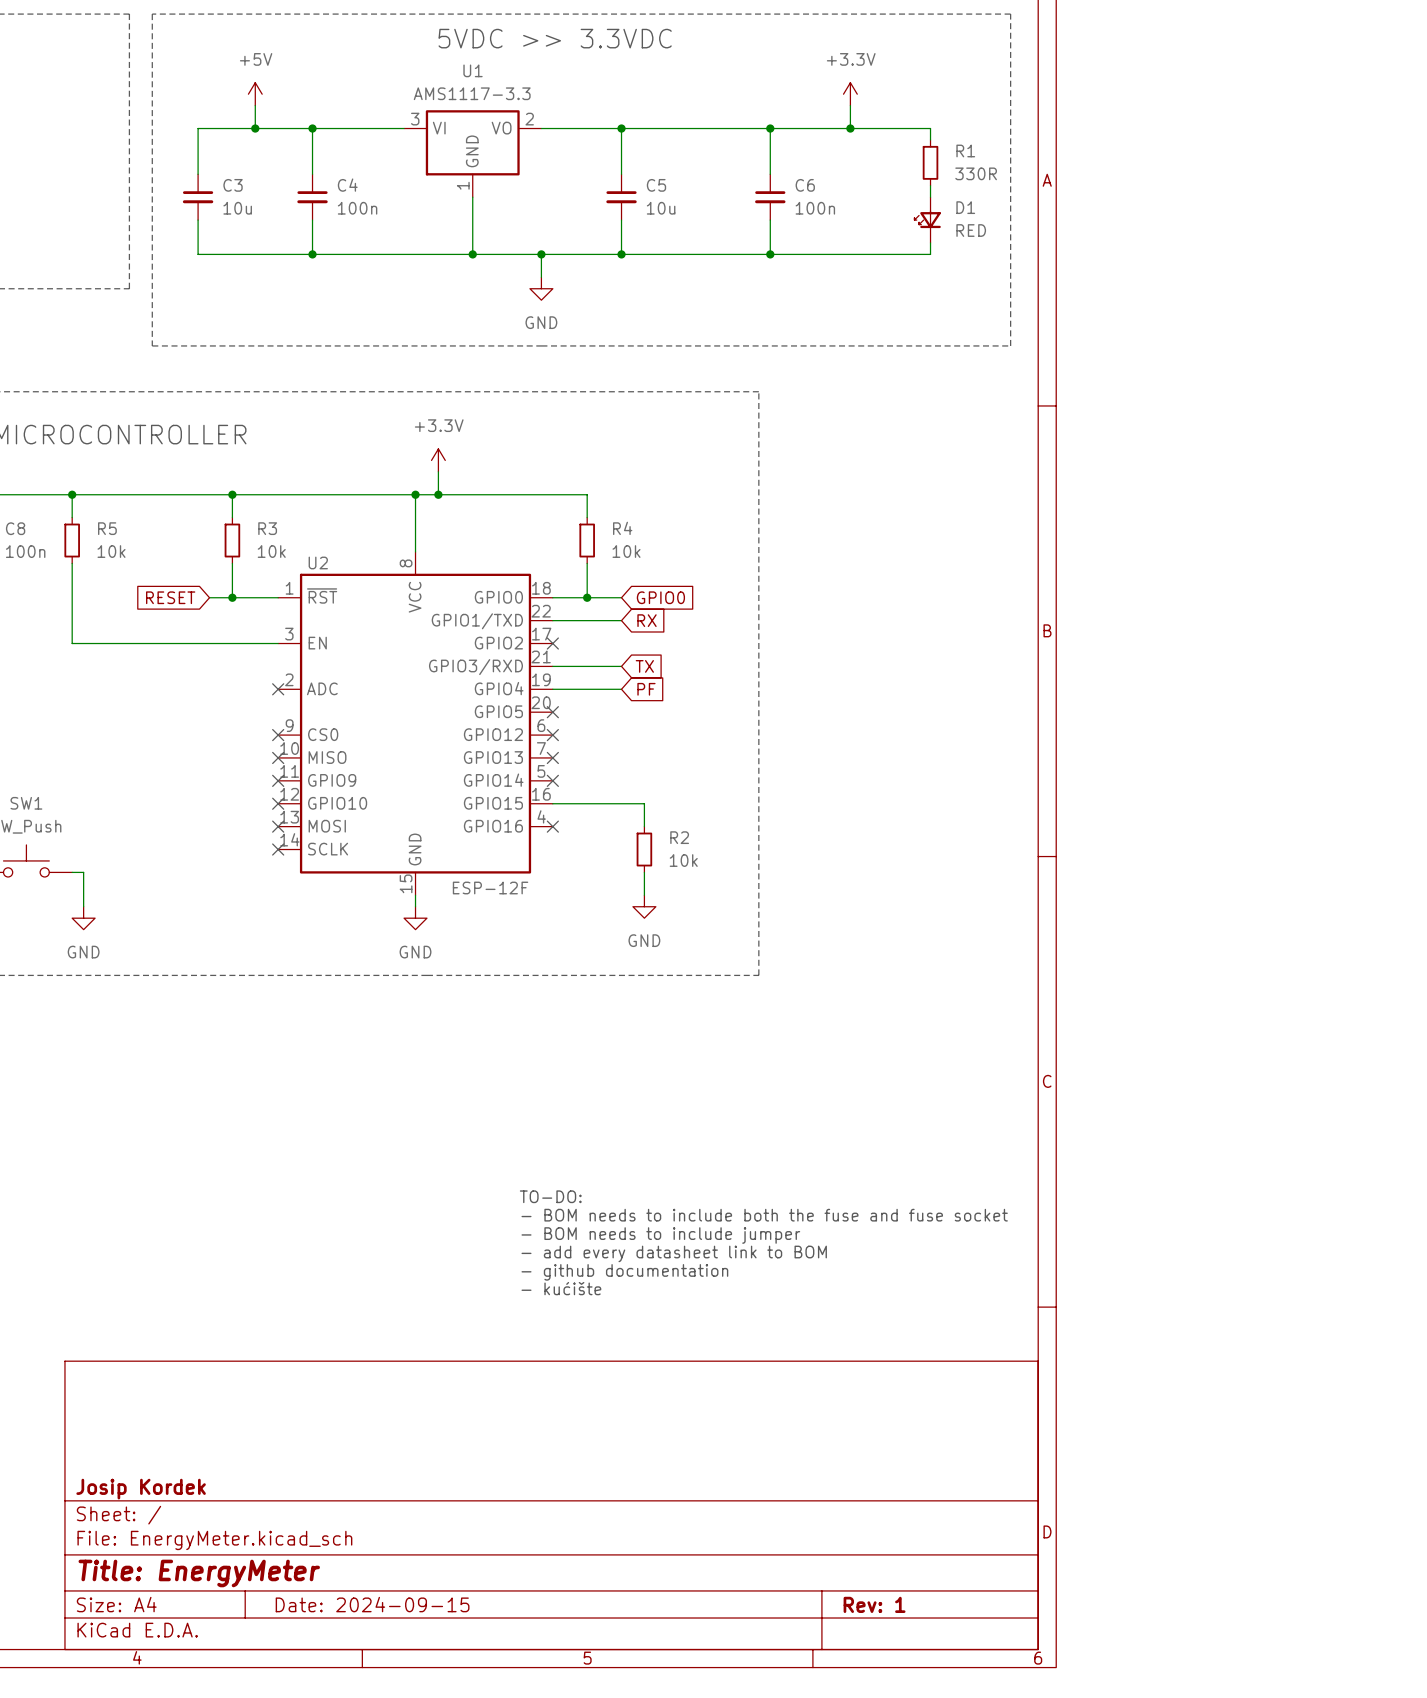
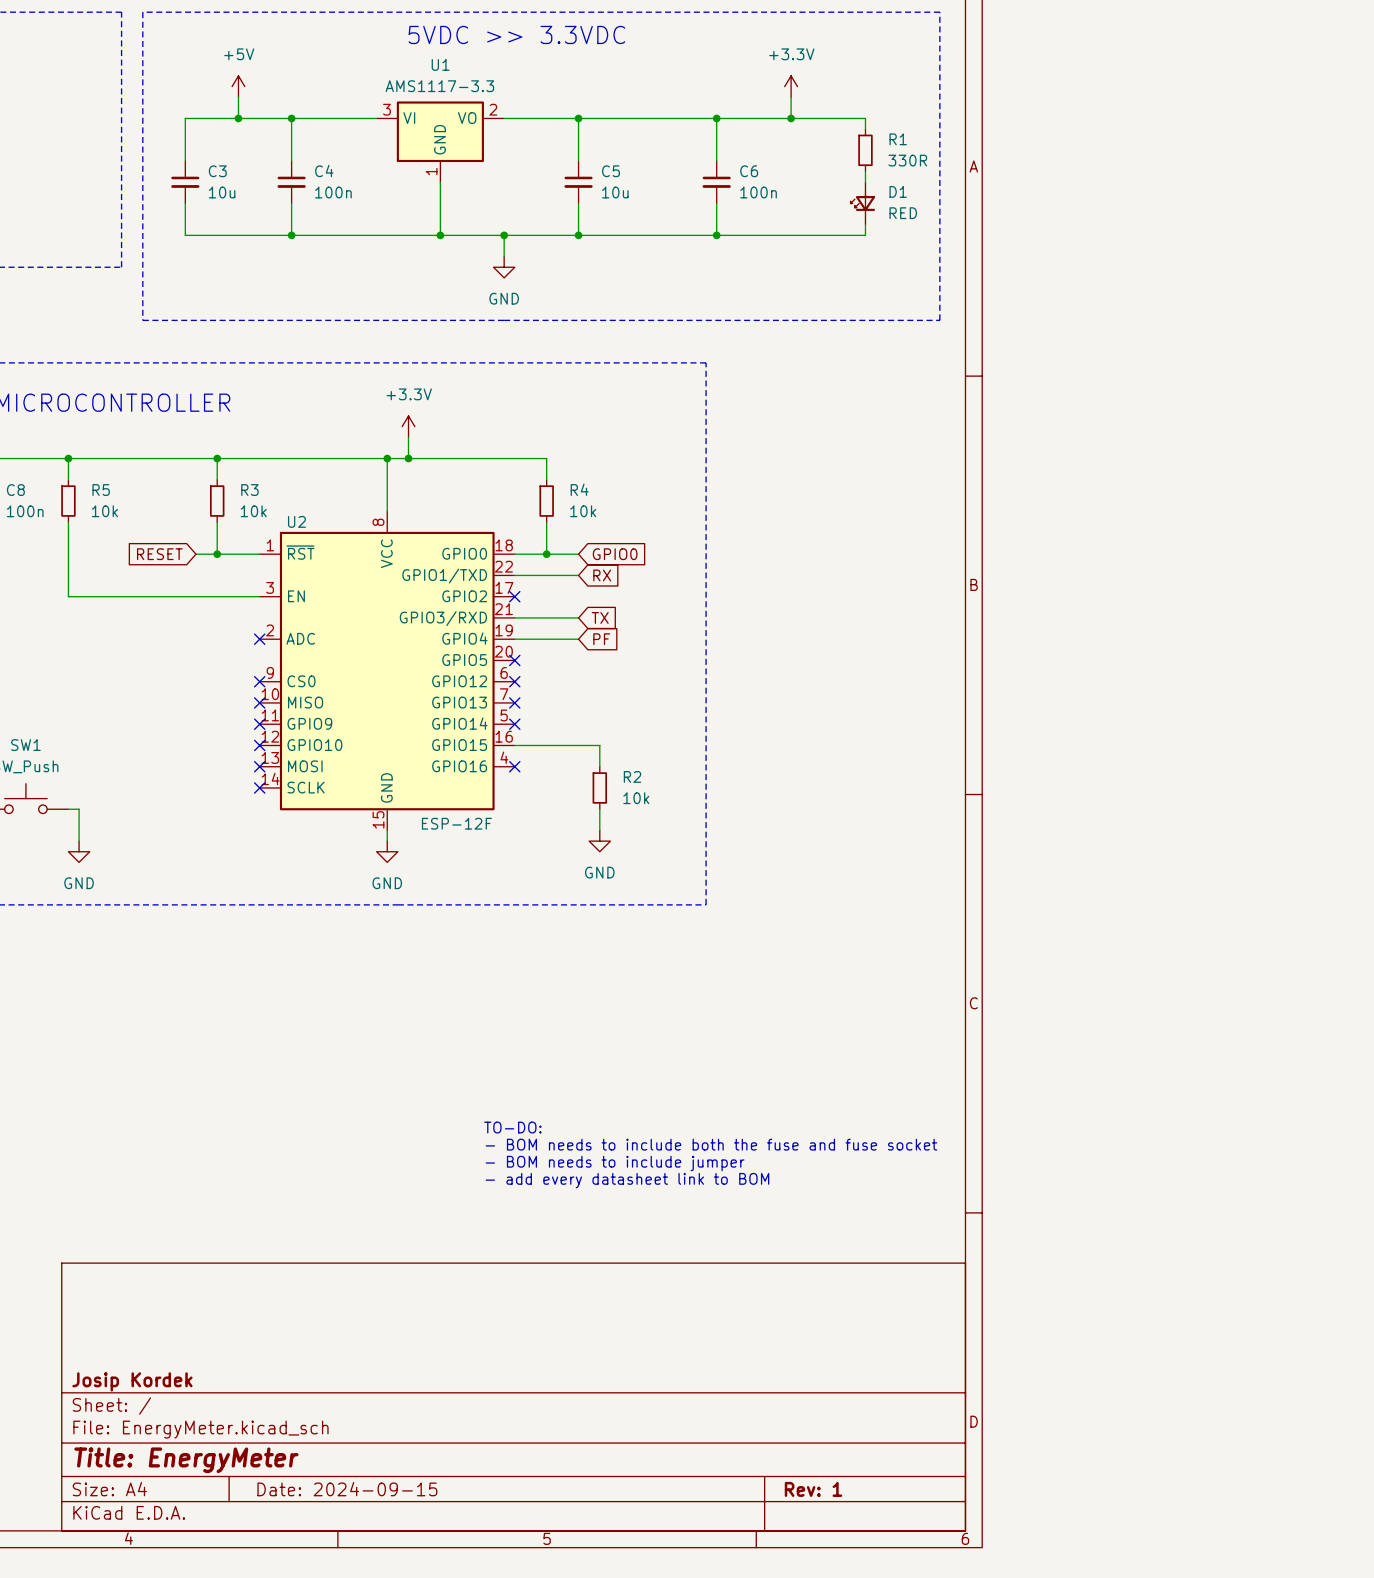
text: TO-DO: (550, 1196) -> none
text: - BOM needs to include both the fuse and fuse socket (764, 1215) -> TO-DO: (512, 1127)
text: - BOM needs to include jumper (660, 1235) -> - BOM needs to include both the fuse and fuse socket (711, 1144)
text: - add every datasheet link to BOM (674, 1253) -> - BOM needs to include jumper (615, 1163)
text: - github documentation (624, 1272) -> - add every datasheet link to BOM (627, 1180)
text: - kućište (561, 1288) -> none

